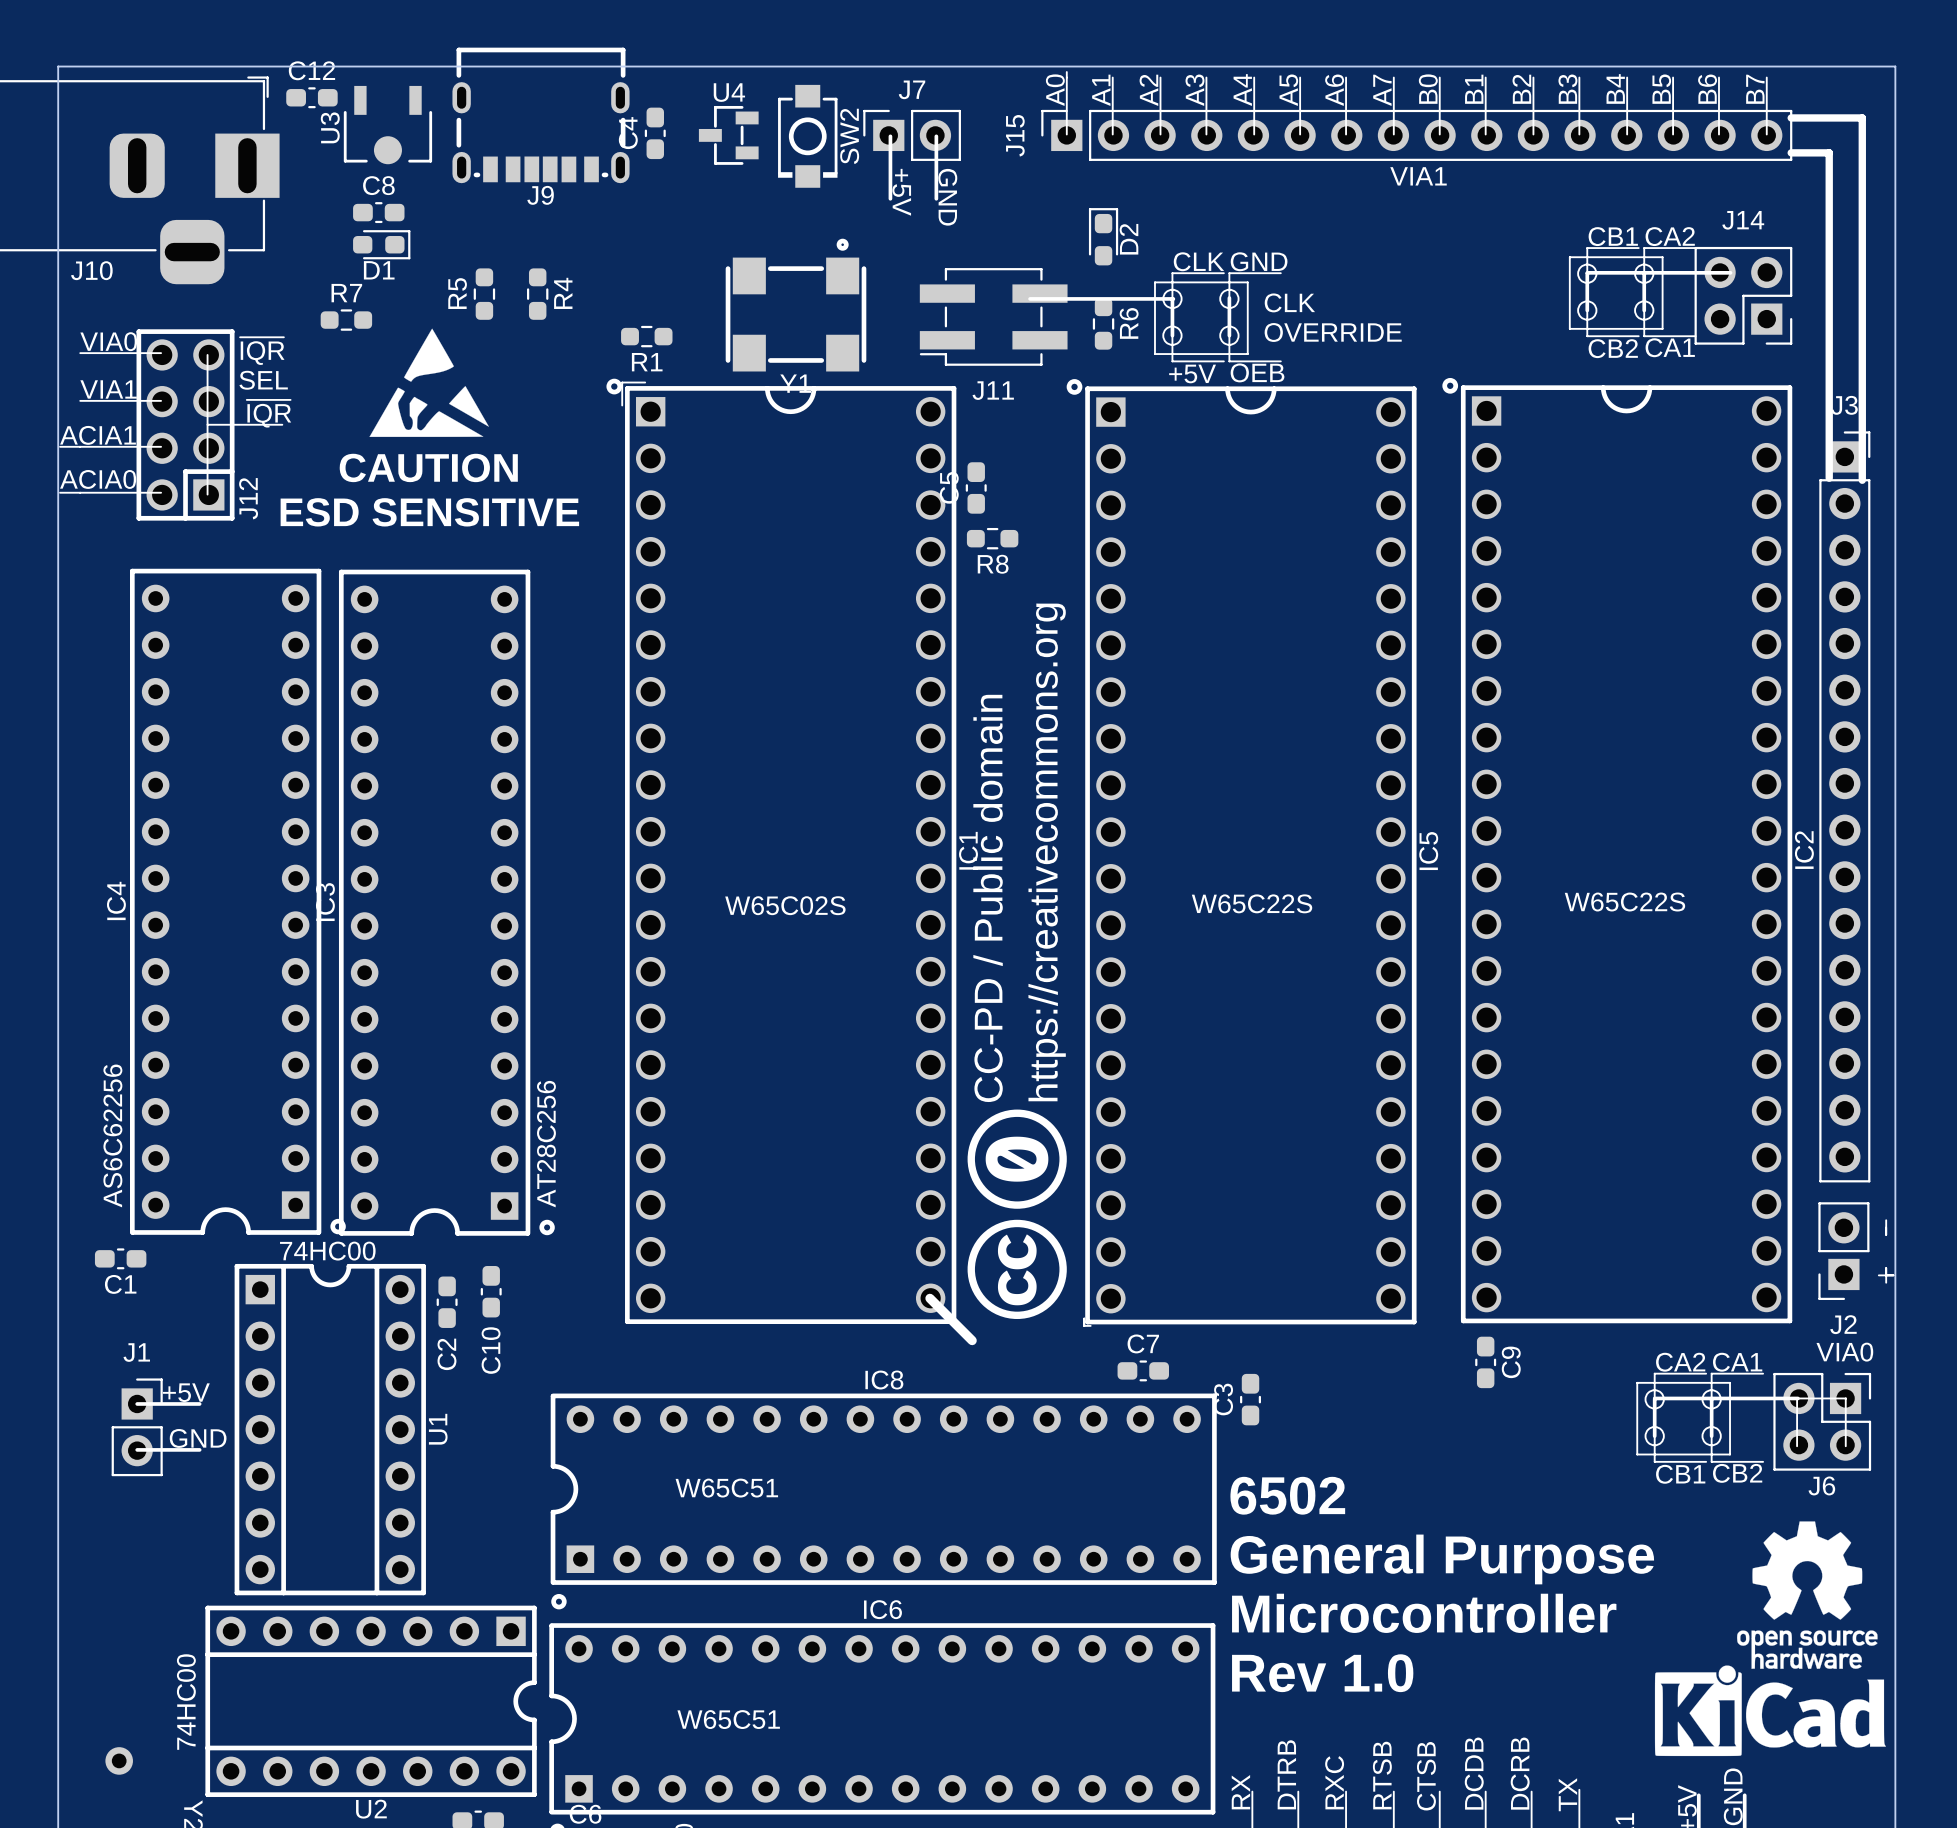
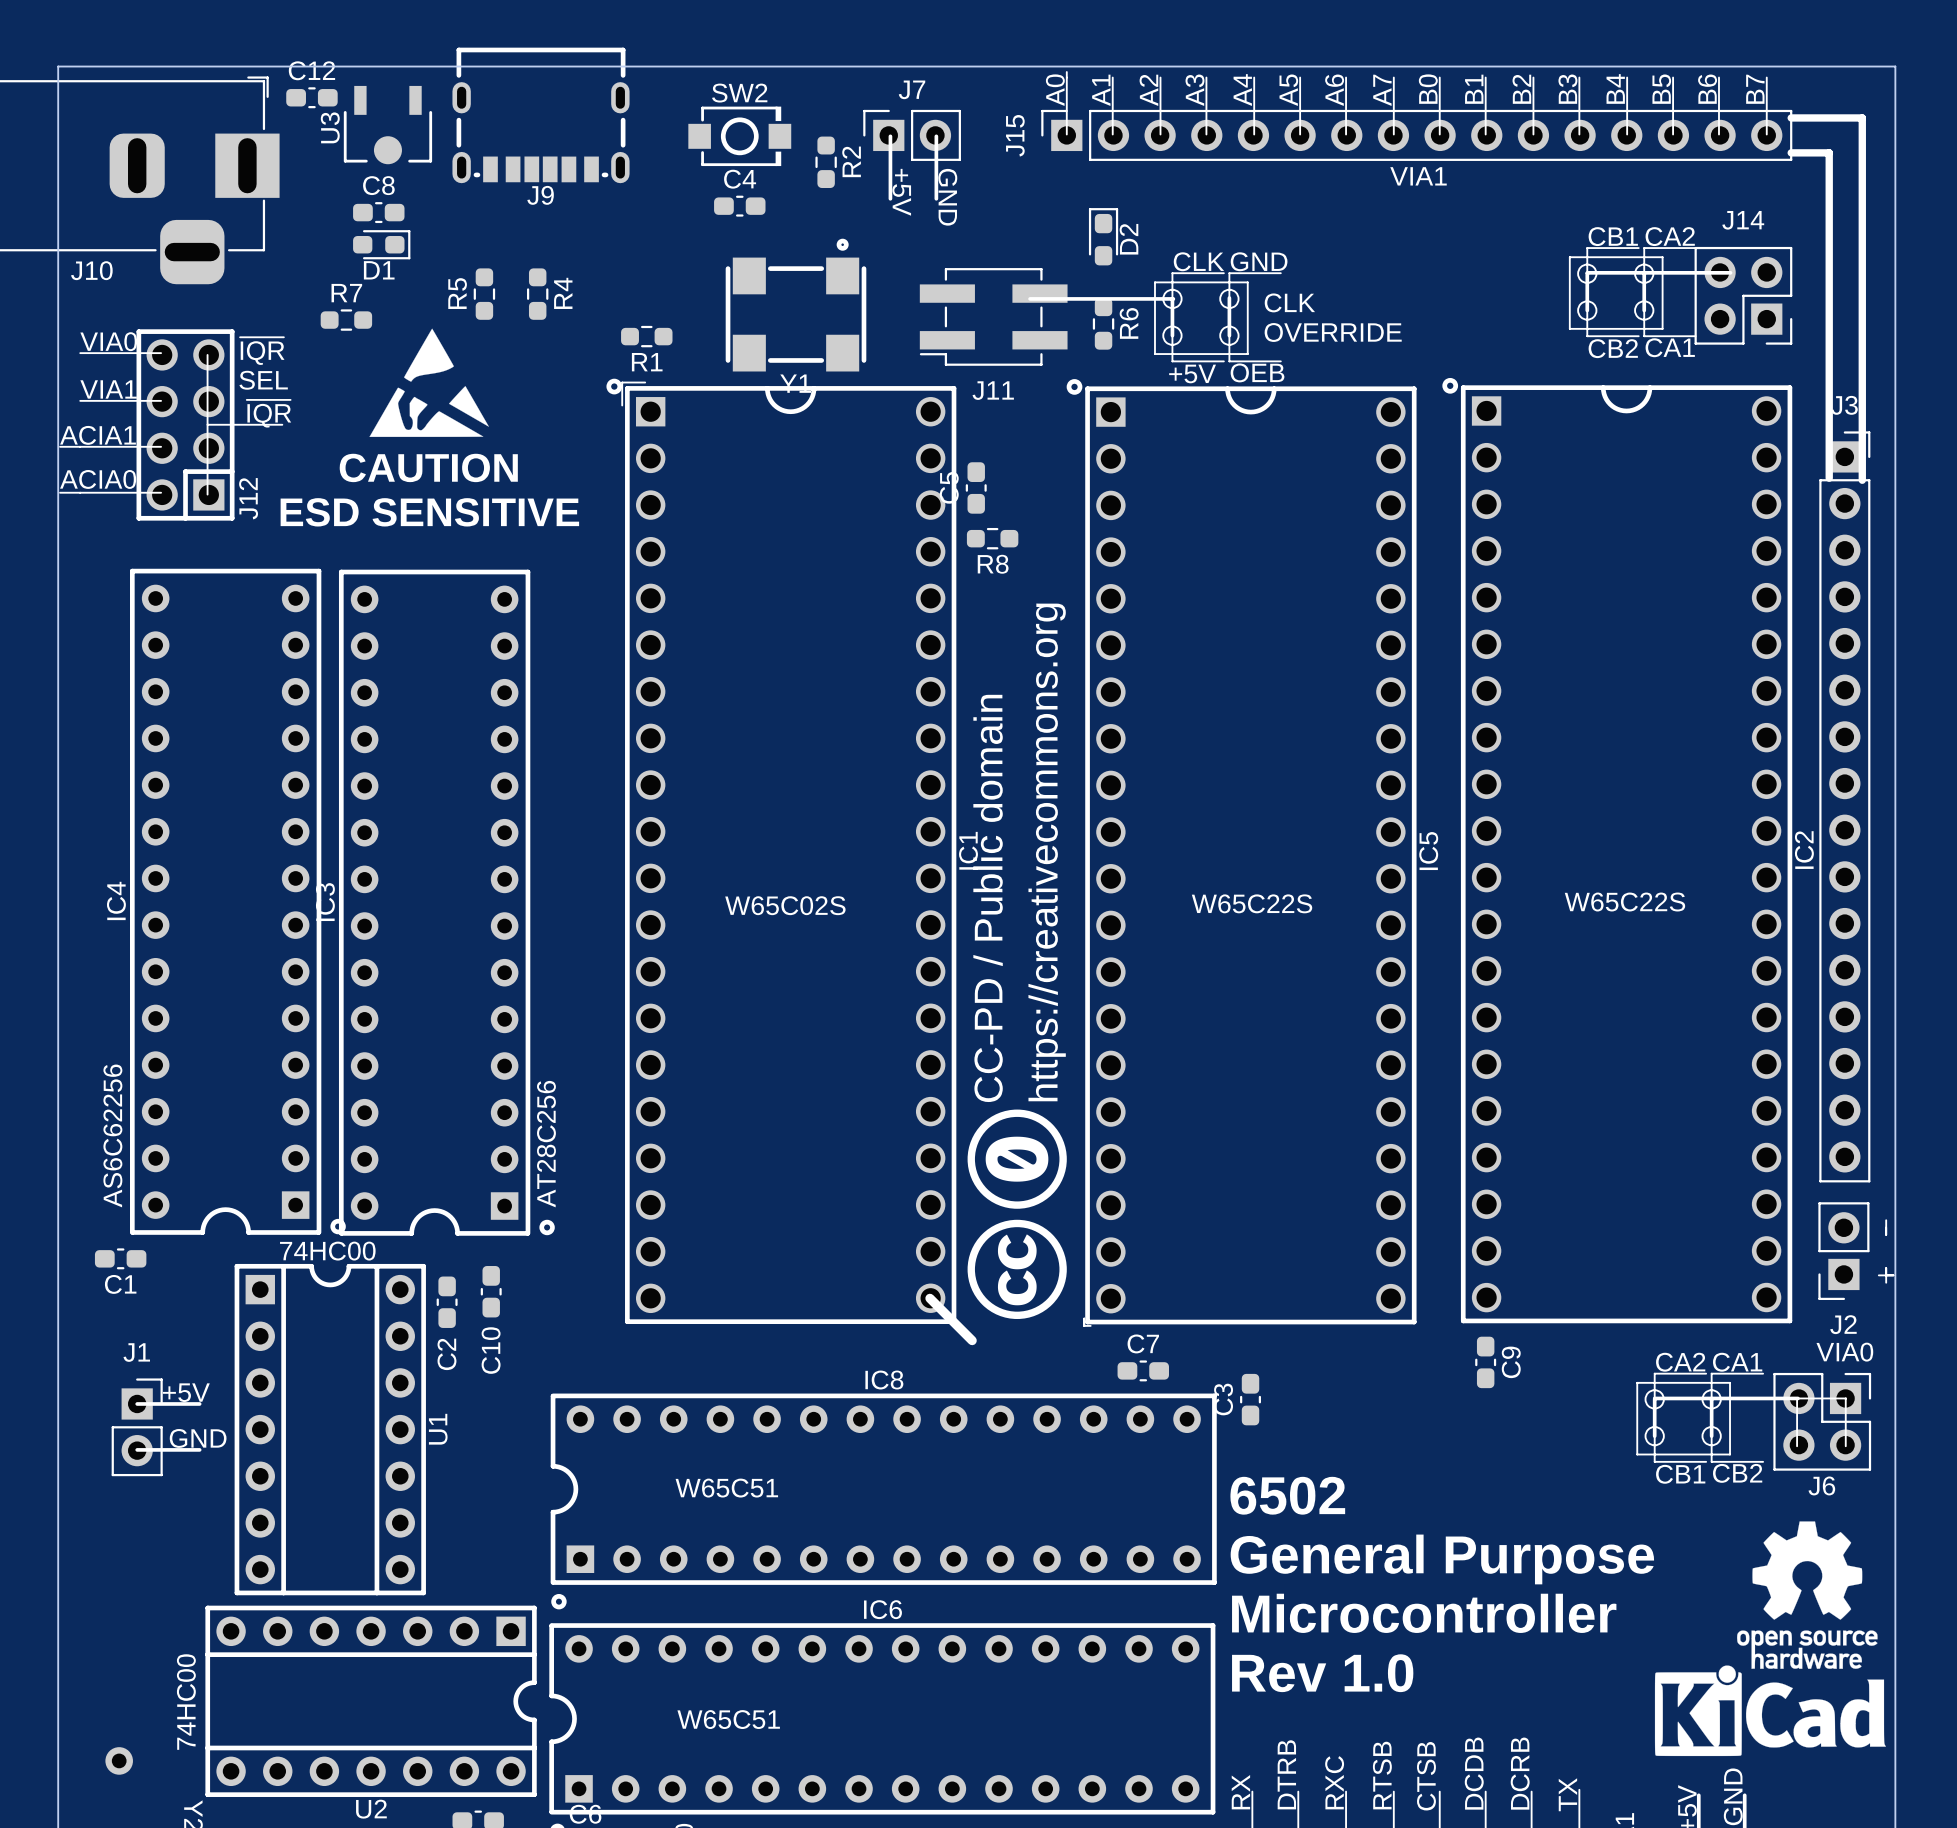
C4 rotation: 0° (655, 133) -> 90° clockwise (739, 206)
C4 position: (655, 133) -> (739, 206)
U4: (728, 135) -> none
SW2 rotation: 0° (807, 136) -> 90° counterclockwise (739, 136)
SW2 position: (807, 136) -> (739, 136)
R2: none -> (826, 162)

